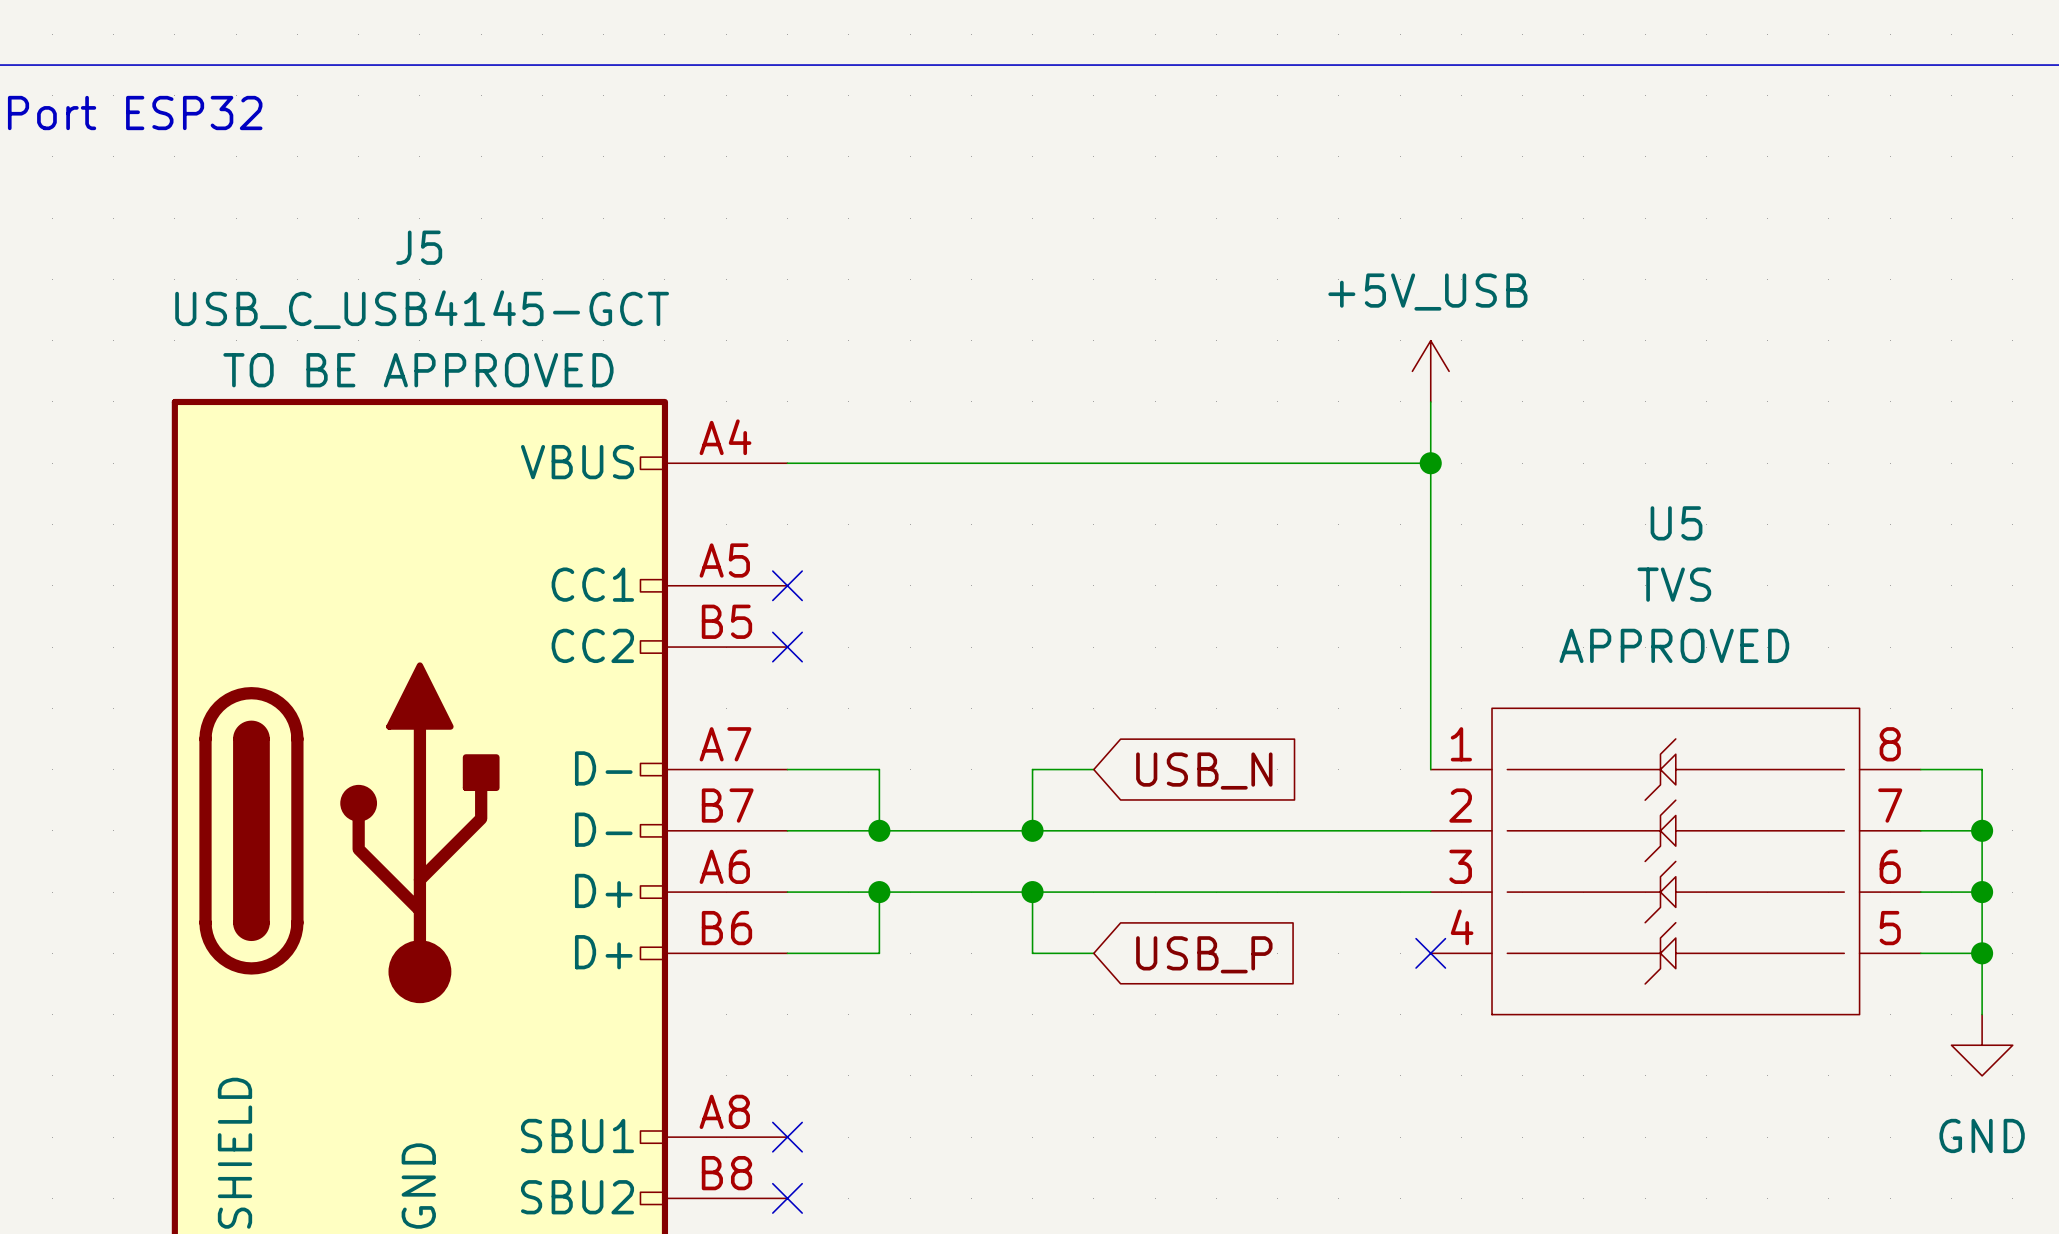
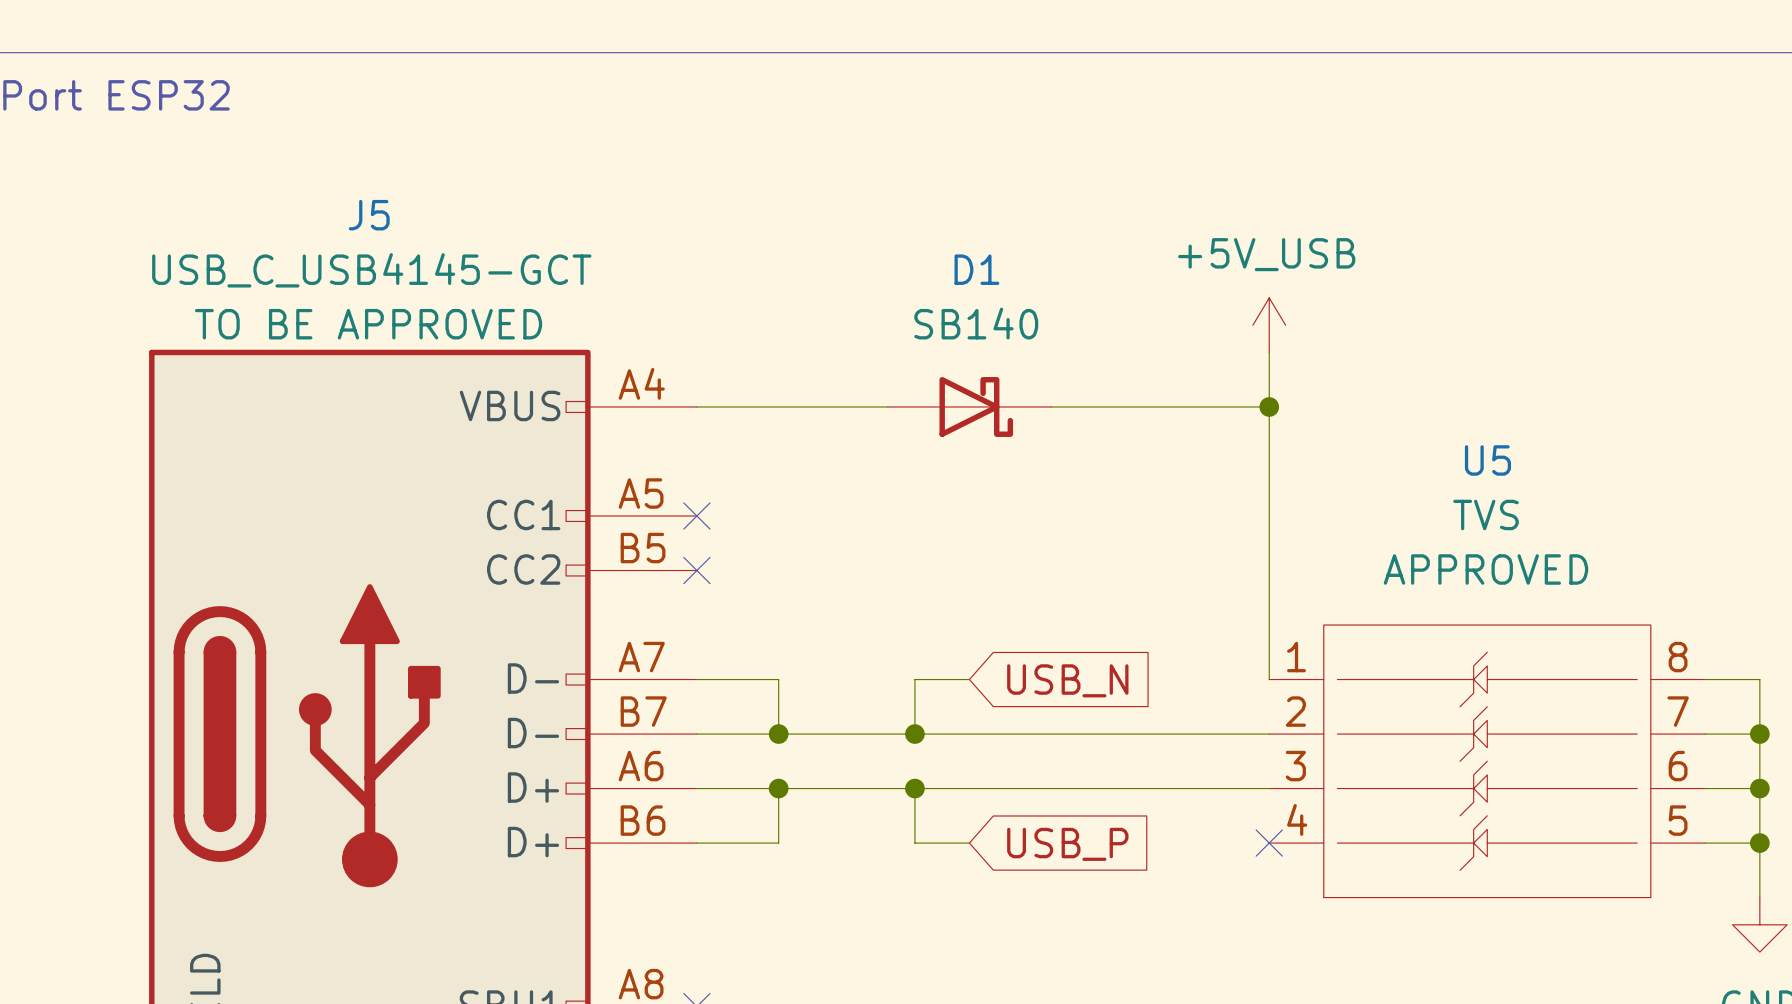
D1: none -> SB140 (969, 406)

